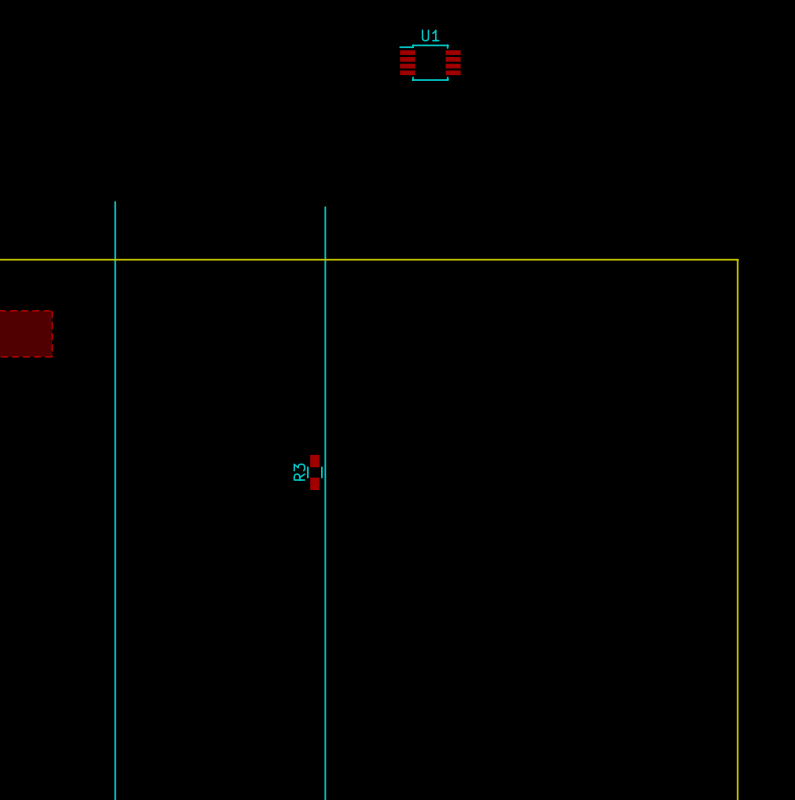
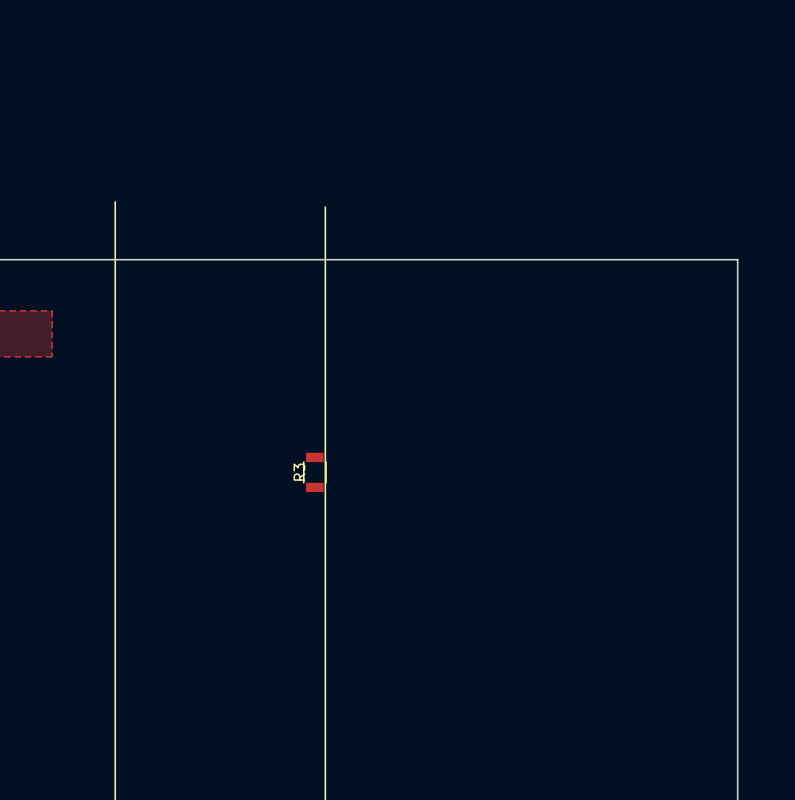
U1: (430, 62) -> none
R3 footprint: [307, 454, 323, 491] -> [303, 452, 327, 493]

